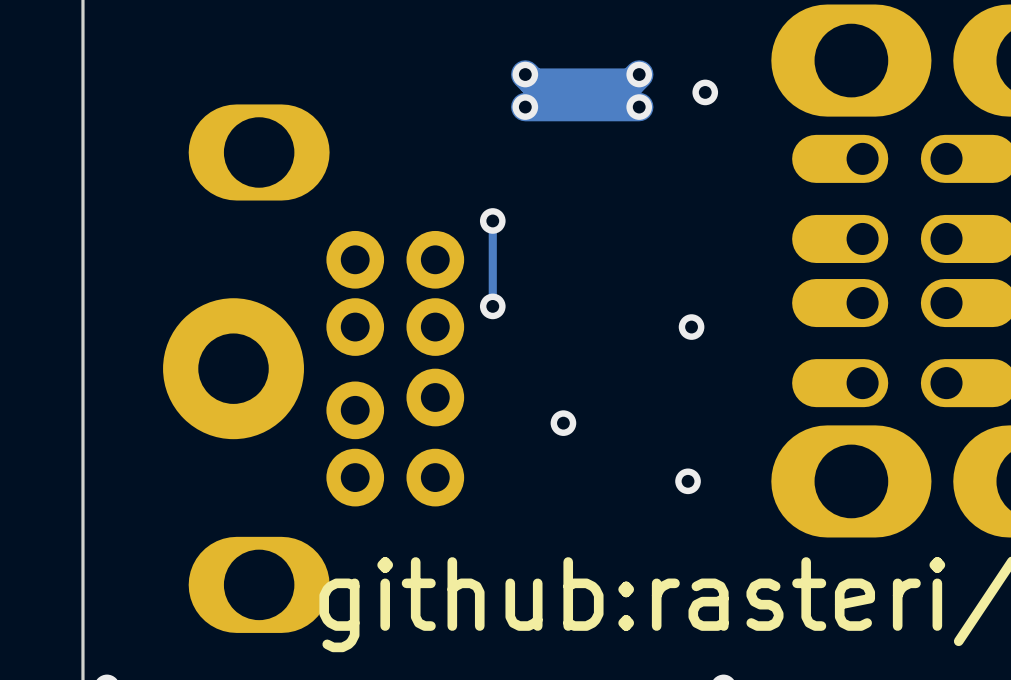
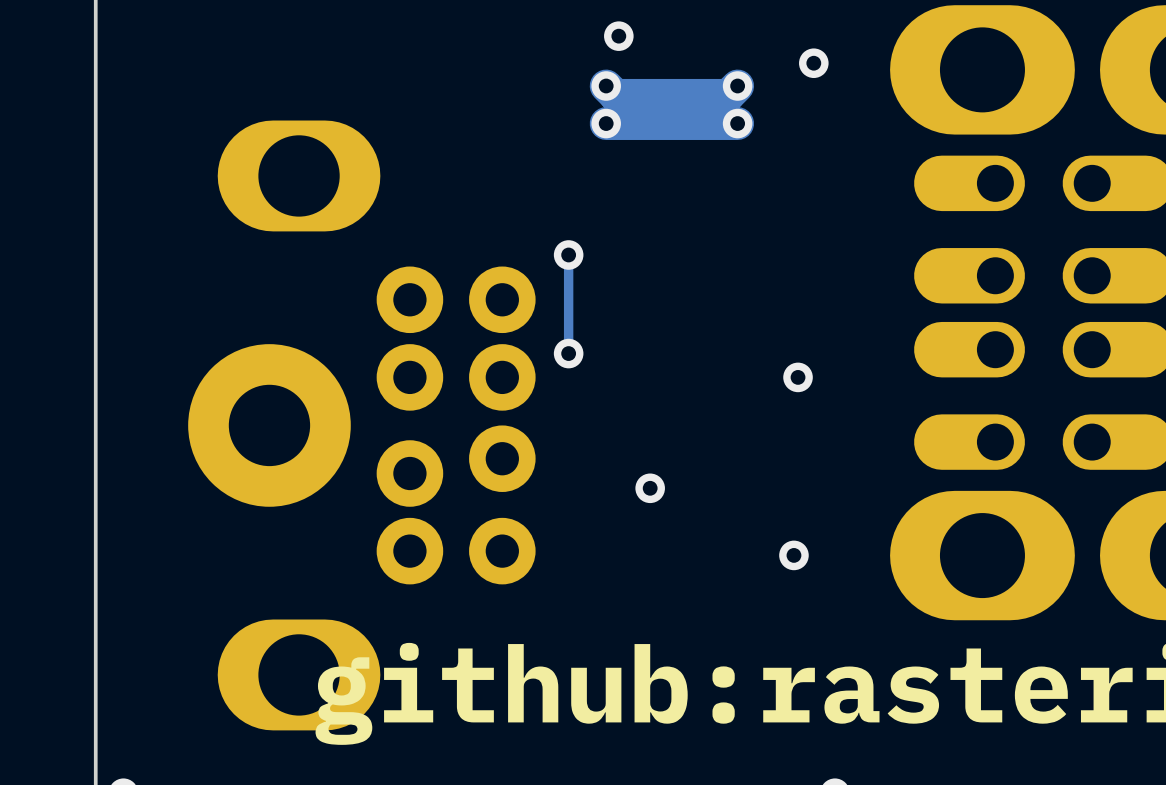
via: none -> (618, 36)
via position: (705, 92) -> (813, 63)

